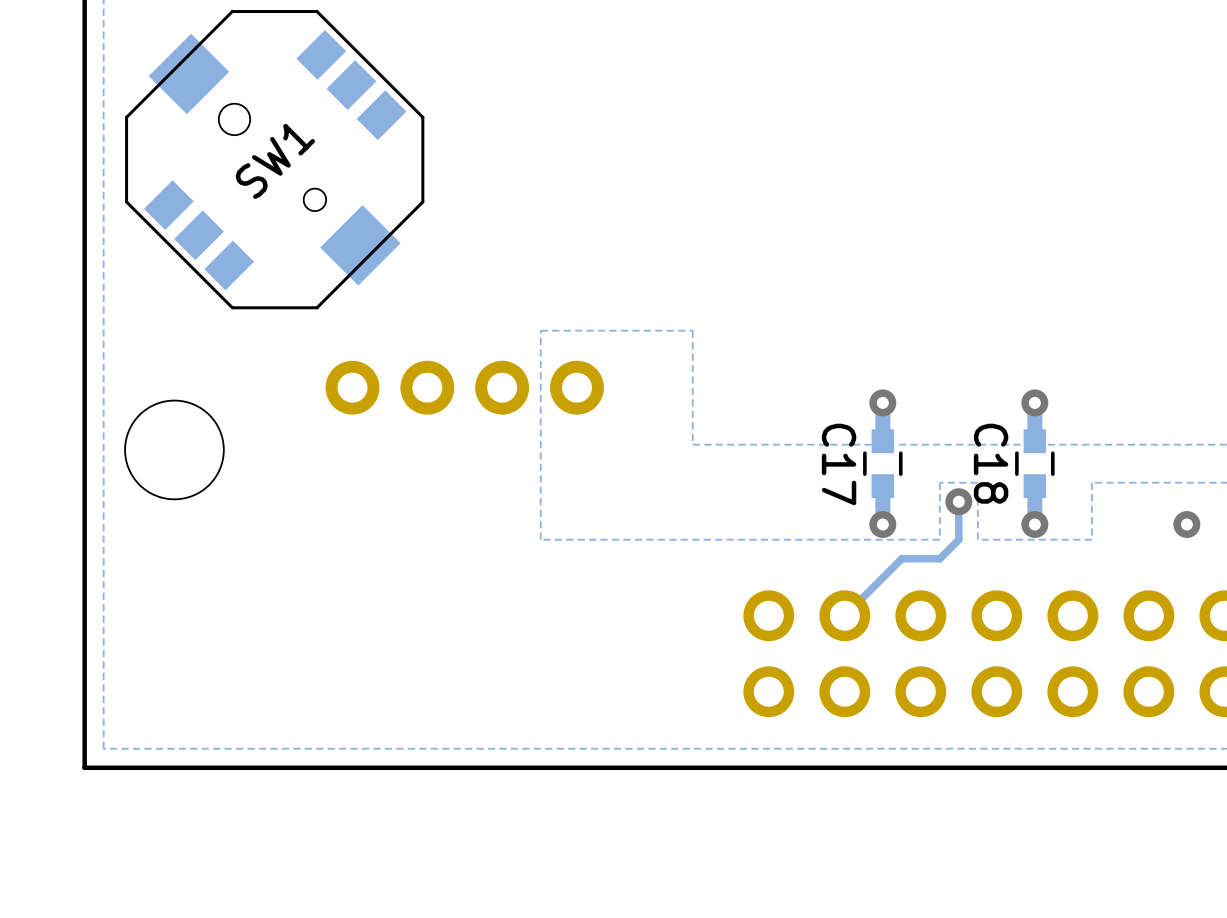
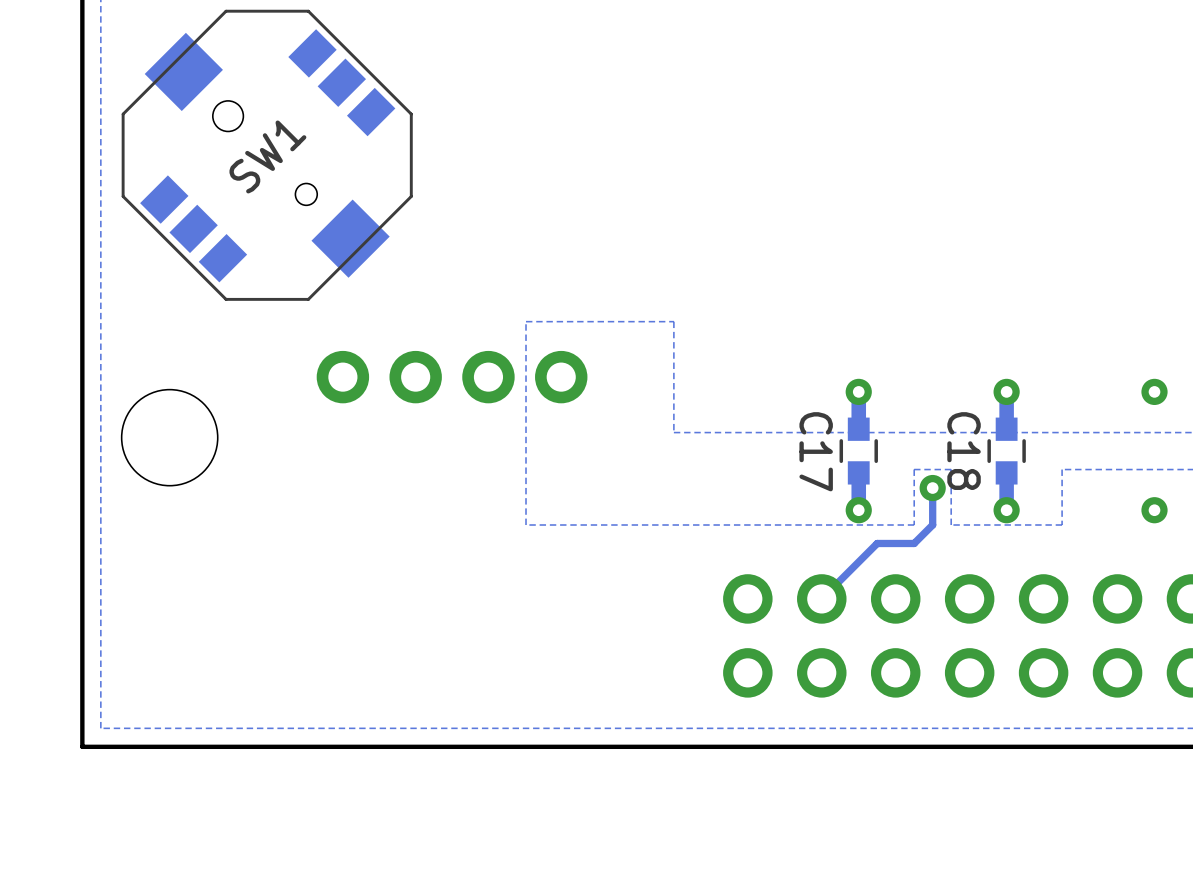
via: none -> (1154, 391)

